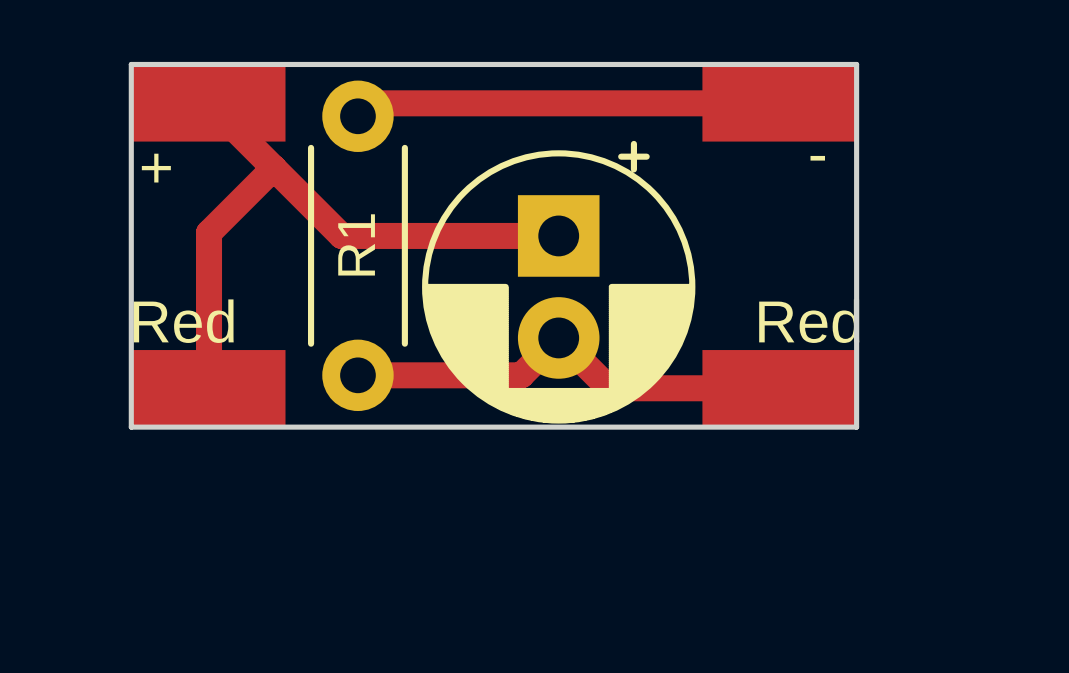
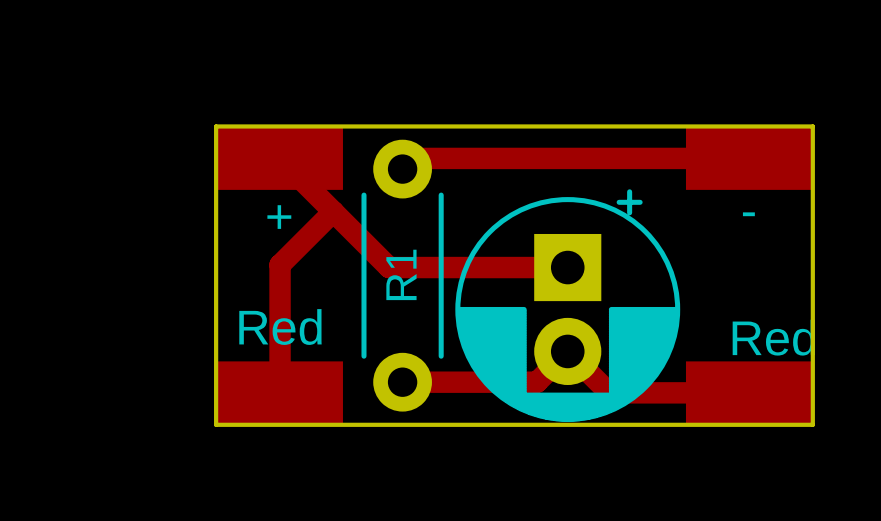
part value position: - (817, 158) -> - (748, 214)
part value position: + (156, 168) -> + (279, 217)
part value position: Red (183, 321) -> Red (280, 327)

